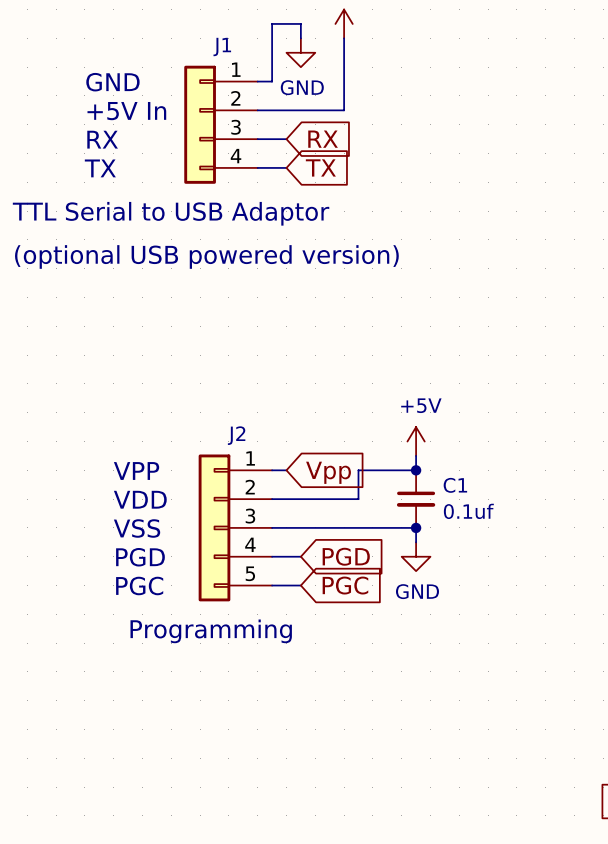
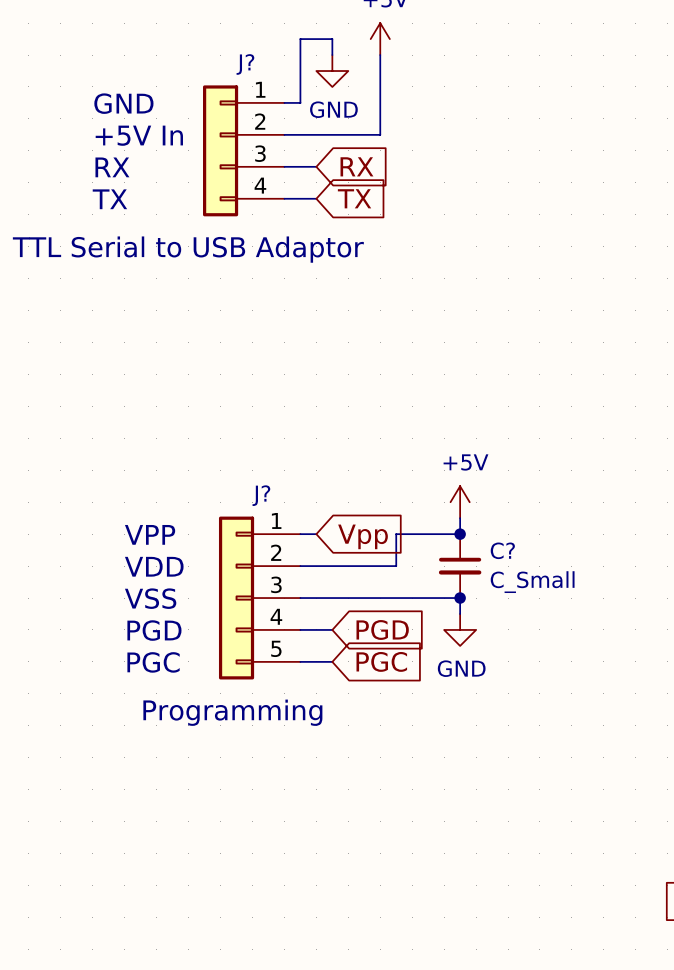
J1 name: J1 (222, 47) -> J? (245, 64)
text: (optional USB powered version) (206, 256) -> none
J2 name: J2 (236, 435) -> J? (261, 495)
C1 name: C1 (455, 485) -> C? (502, 550)
C1 value: 0.1uf (468, 511) -> C_Small (532, 582)

